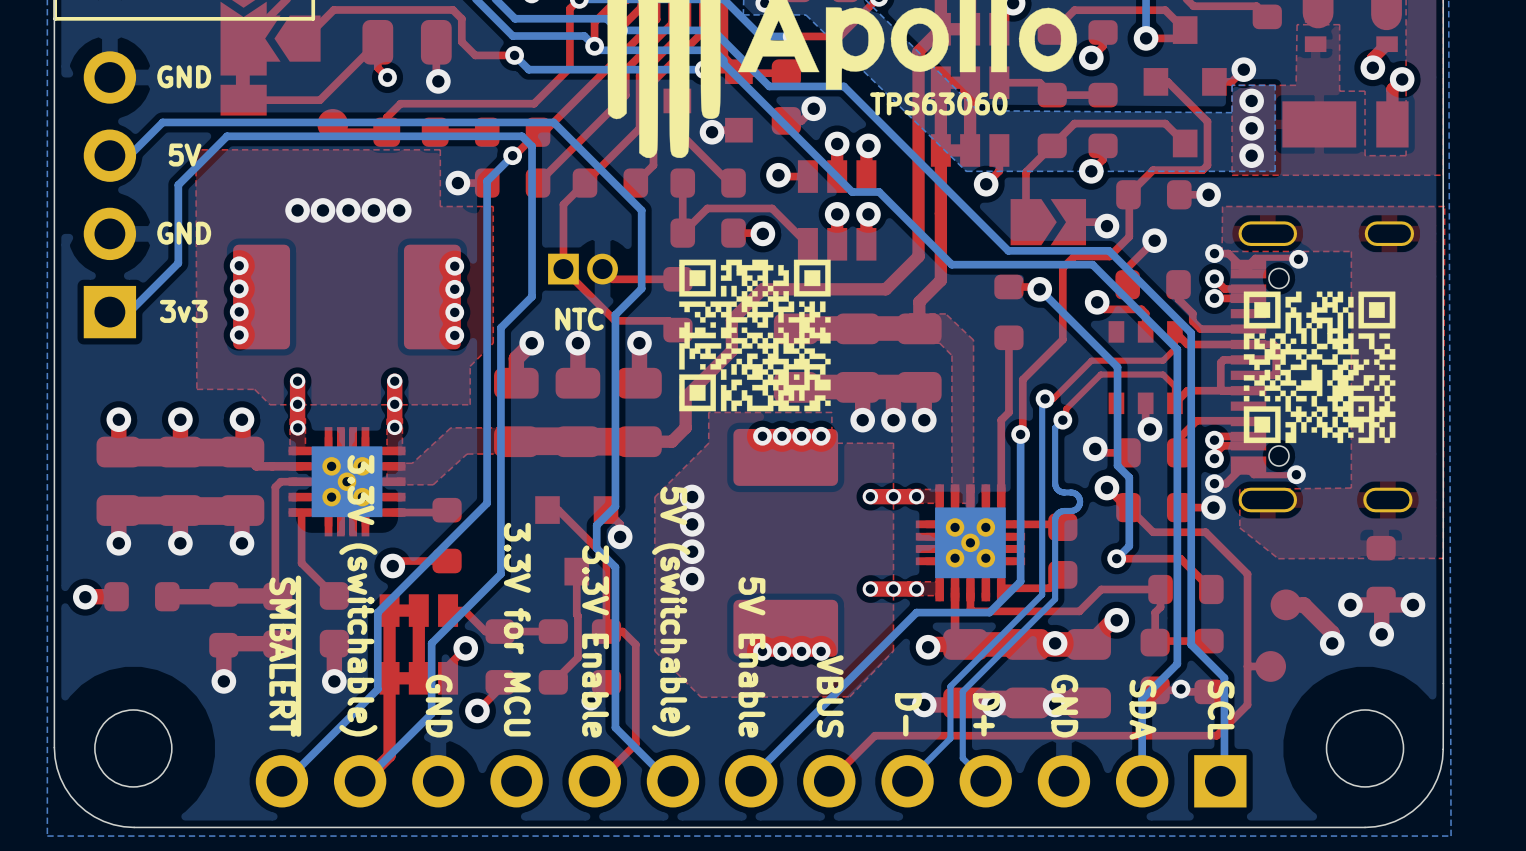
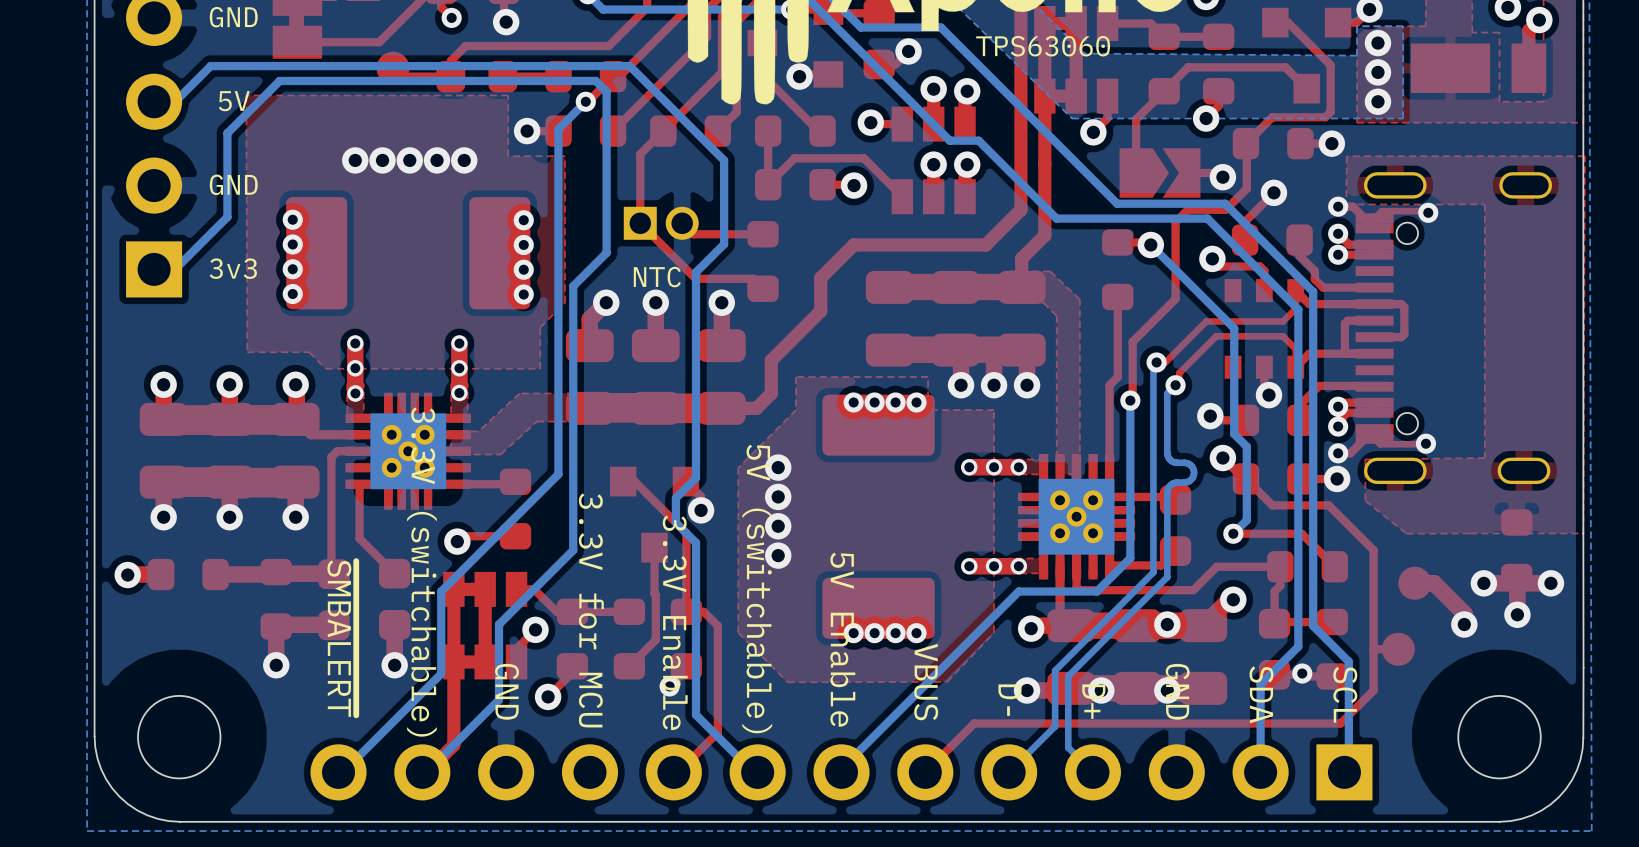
drawing: [679, 259, 831, 412] -> none
drawing: [1243, 291, 1396, 444] -> none

